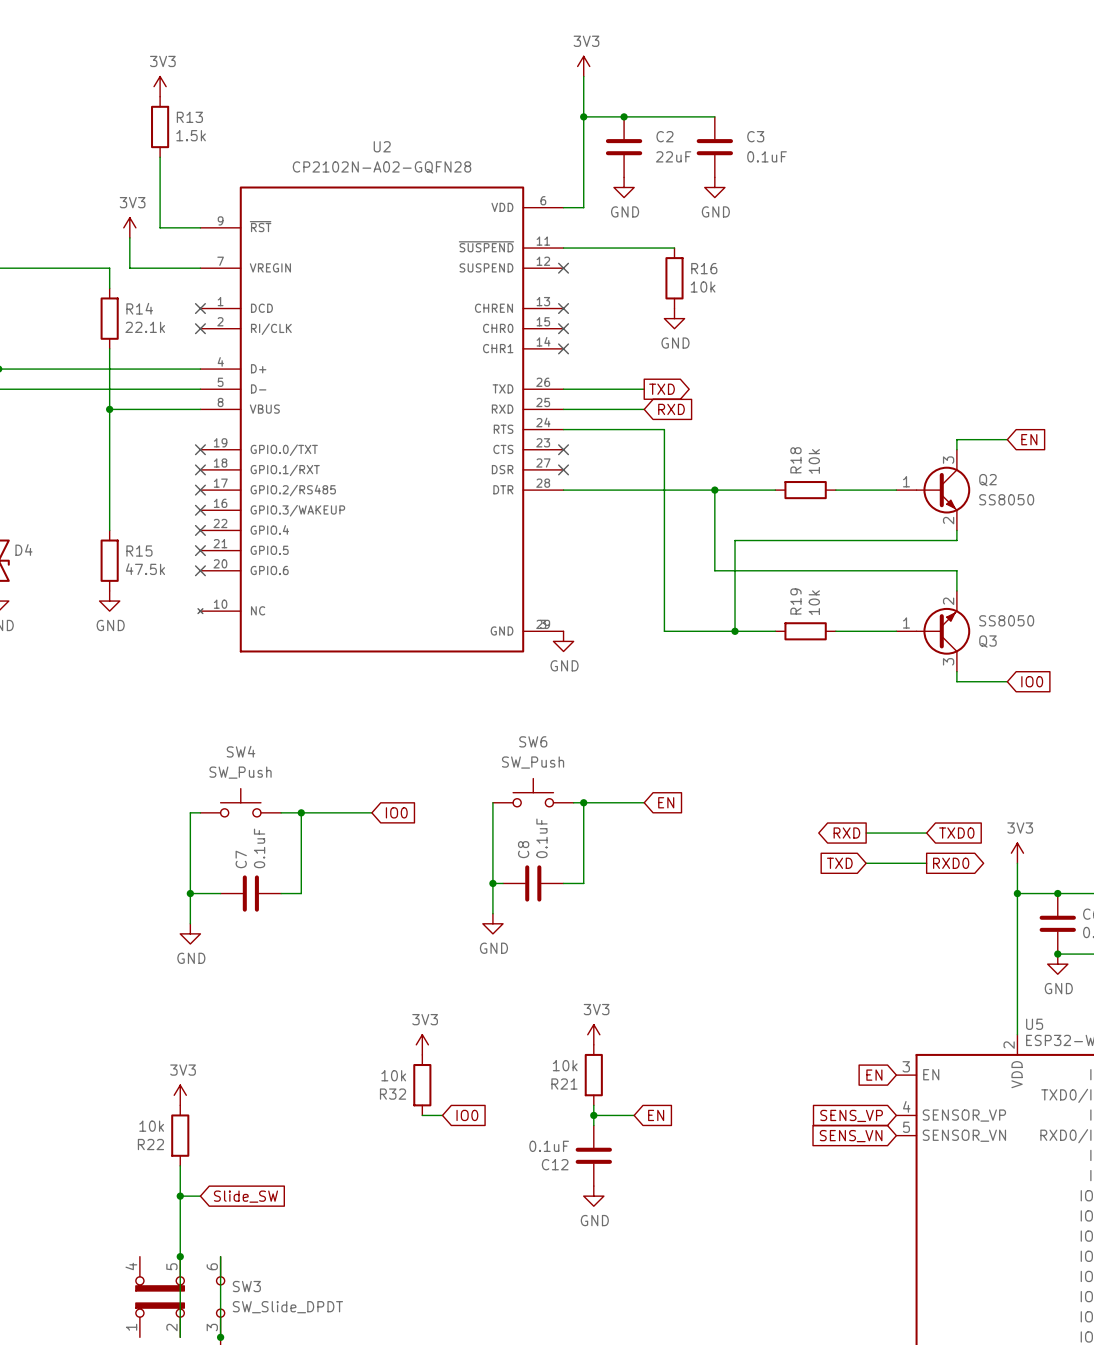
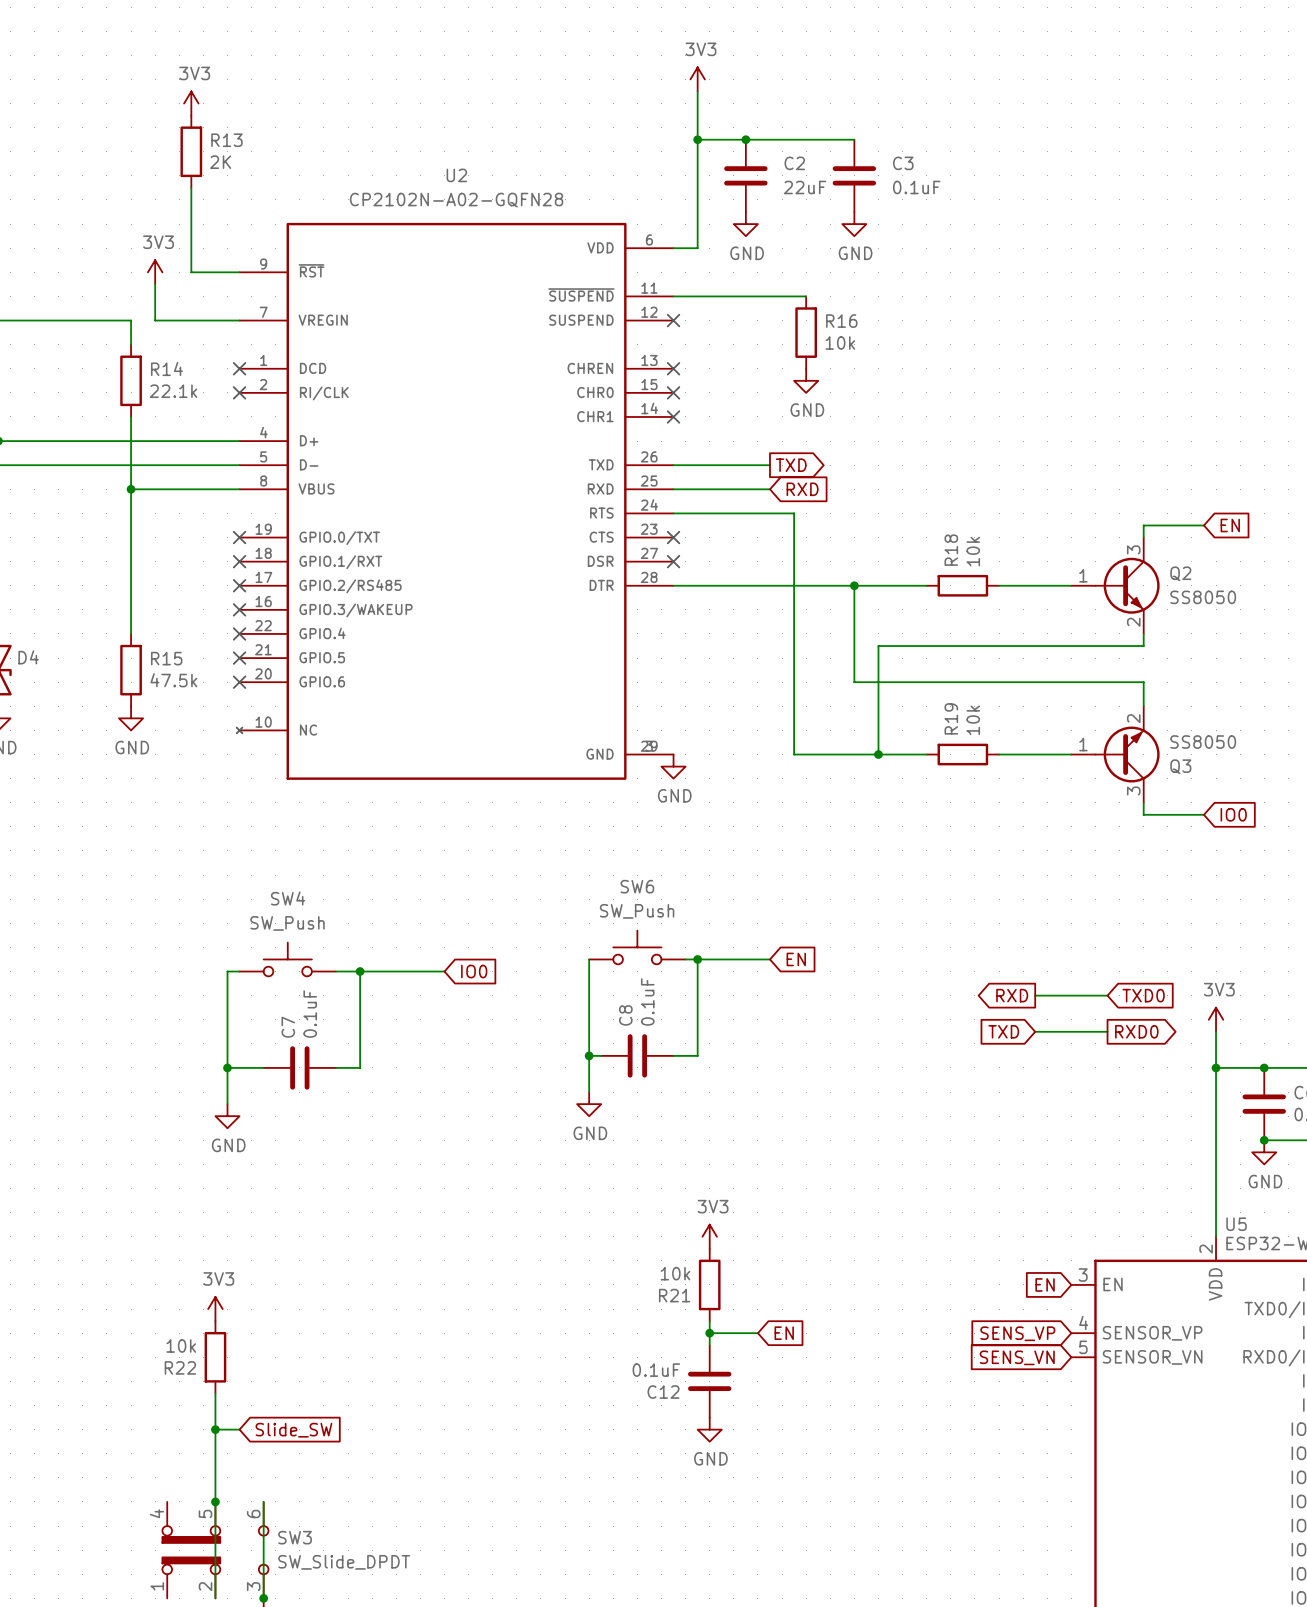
R13 value: 1.5k (191, 135) -> 2K (220, 162)
power symbol: 3V3 (422, 1044) -> none
R32: 10k (422, 1085) -> none
wire: (422, 1115) (442, 1115) -> none
global label: IO0 (467, 1115) -> none

